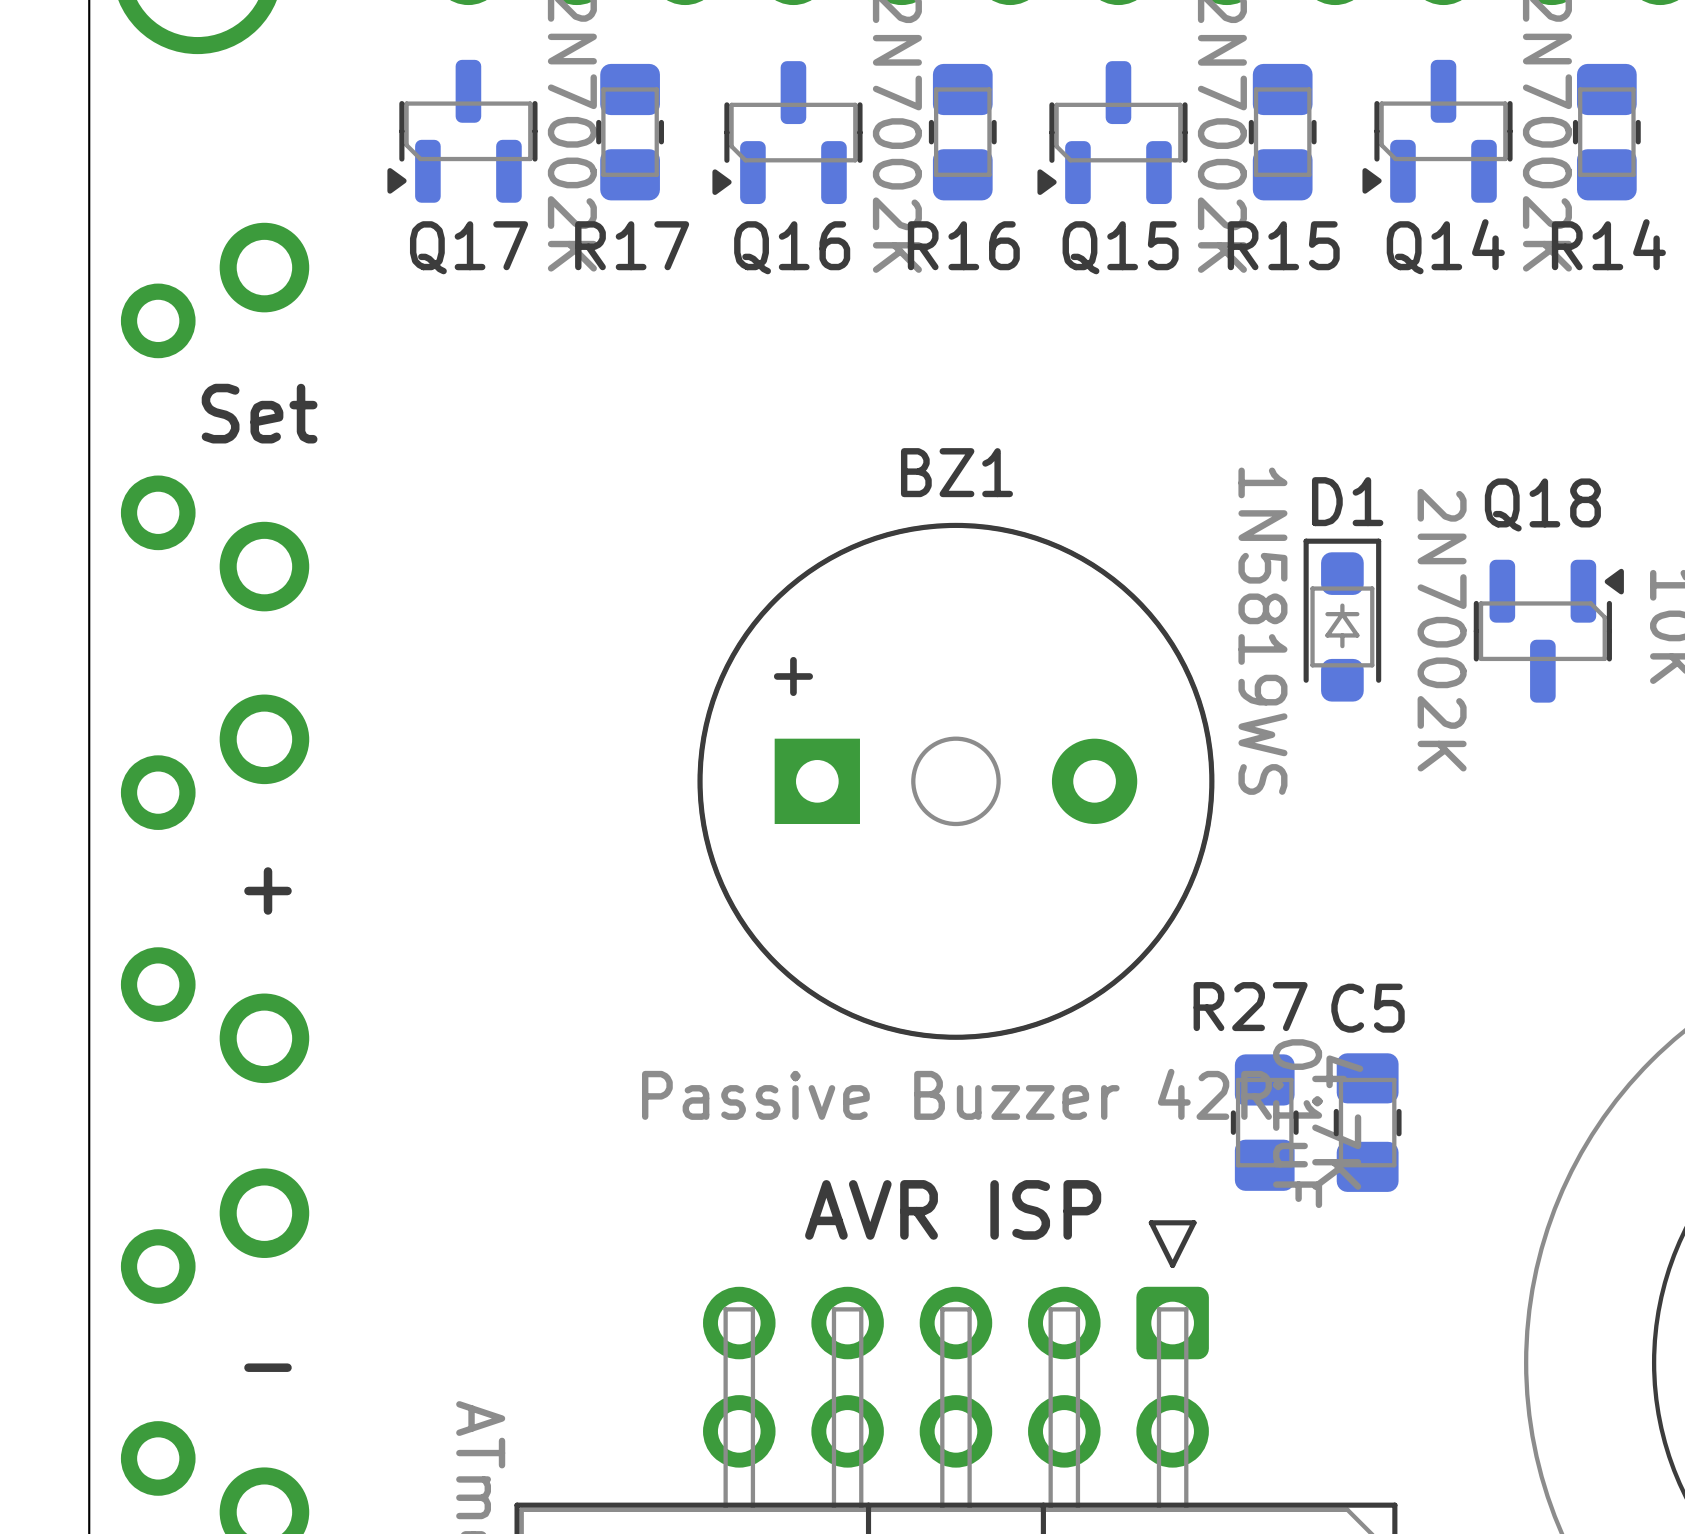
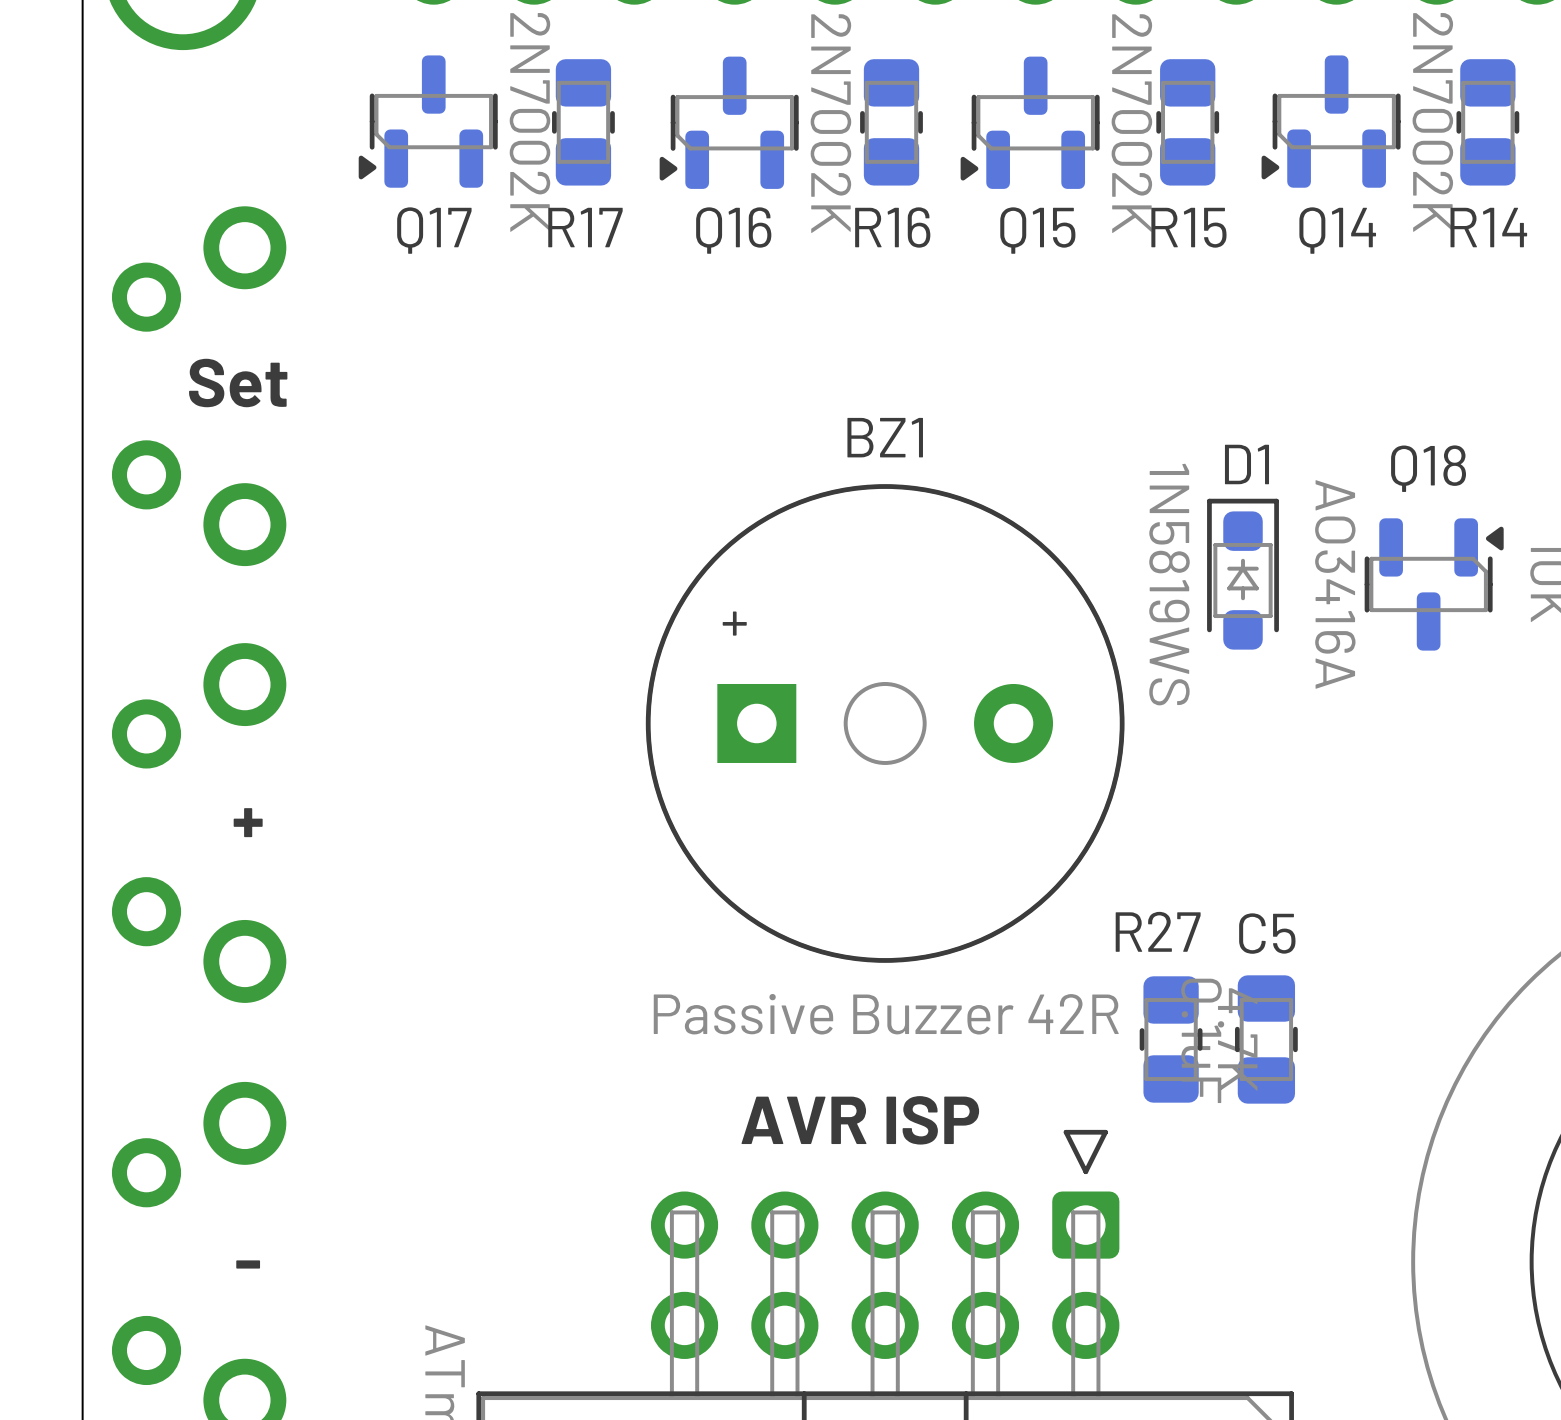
Q18 value: 2N7002K (1442, 630) -> AO3416A (1335, 584)

